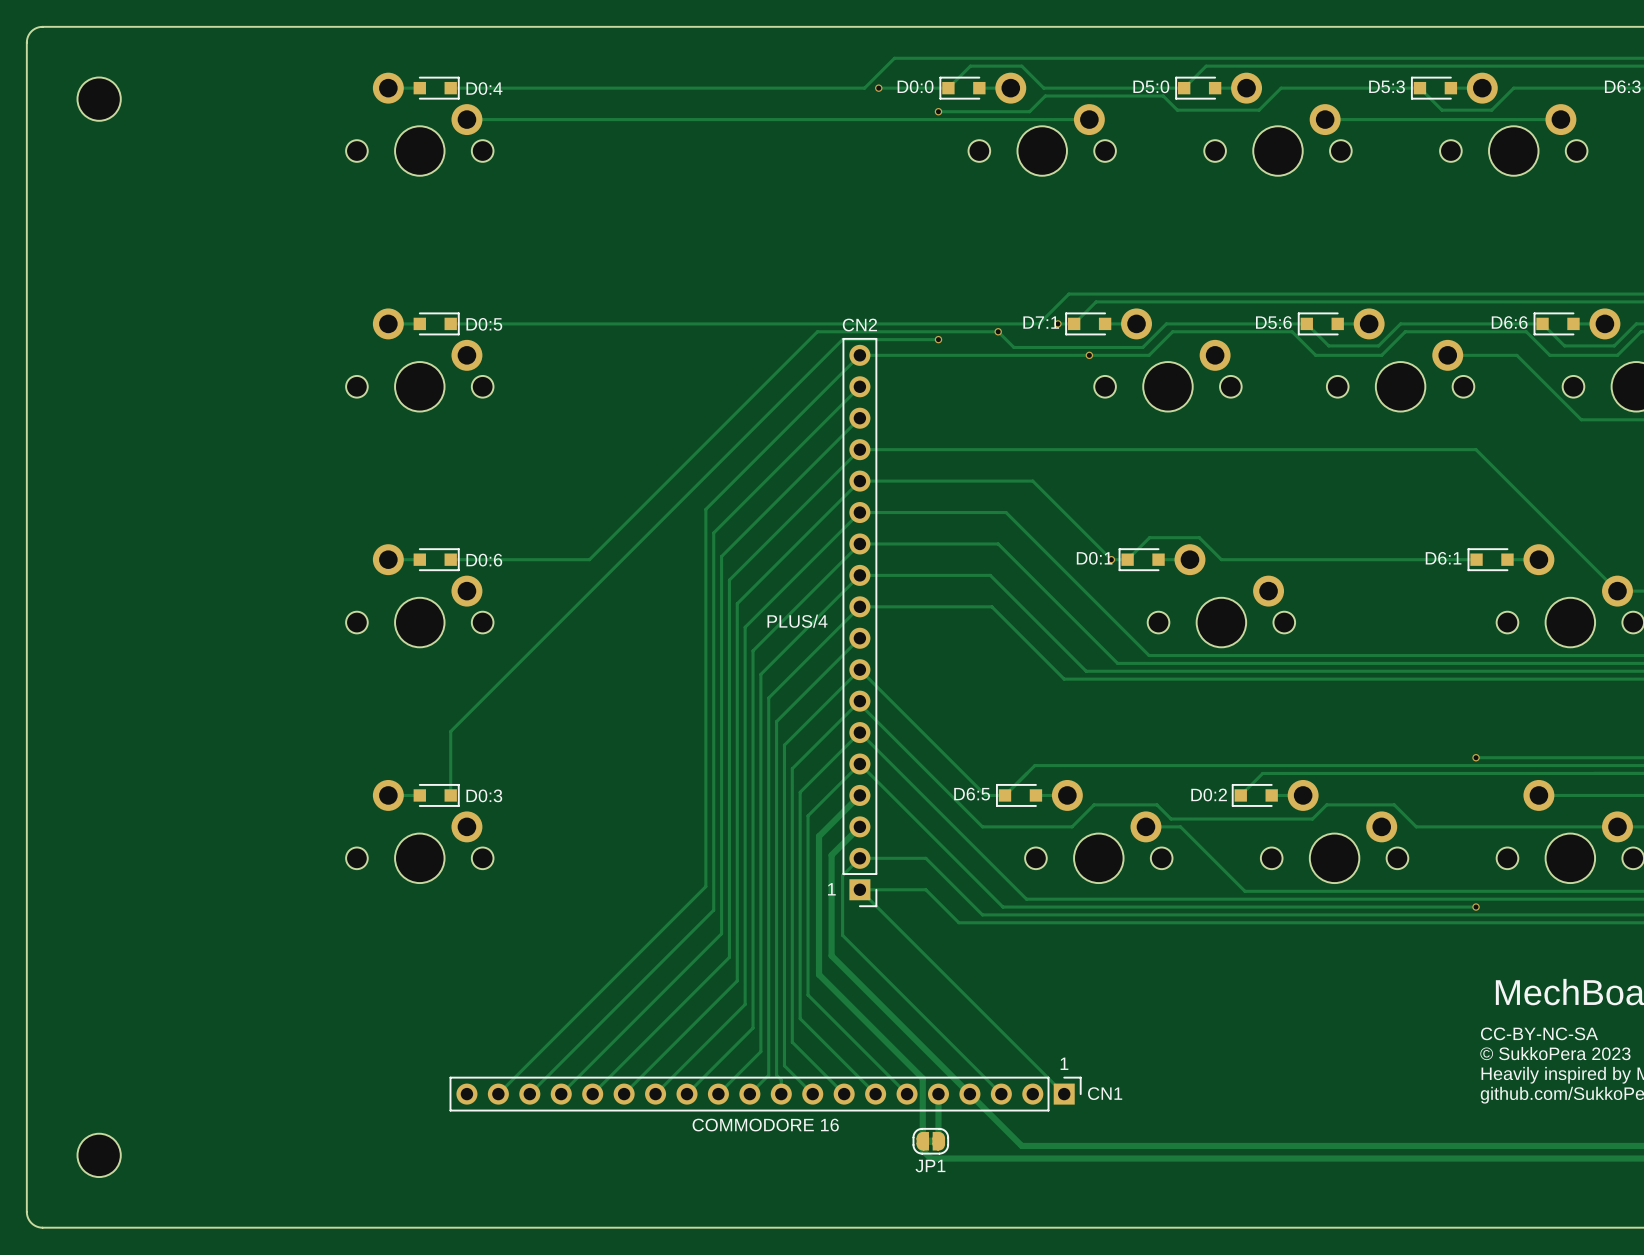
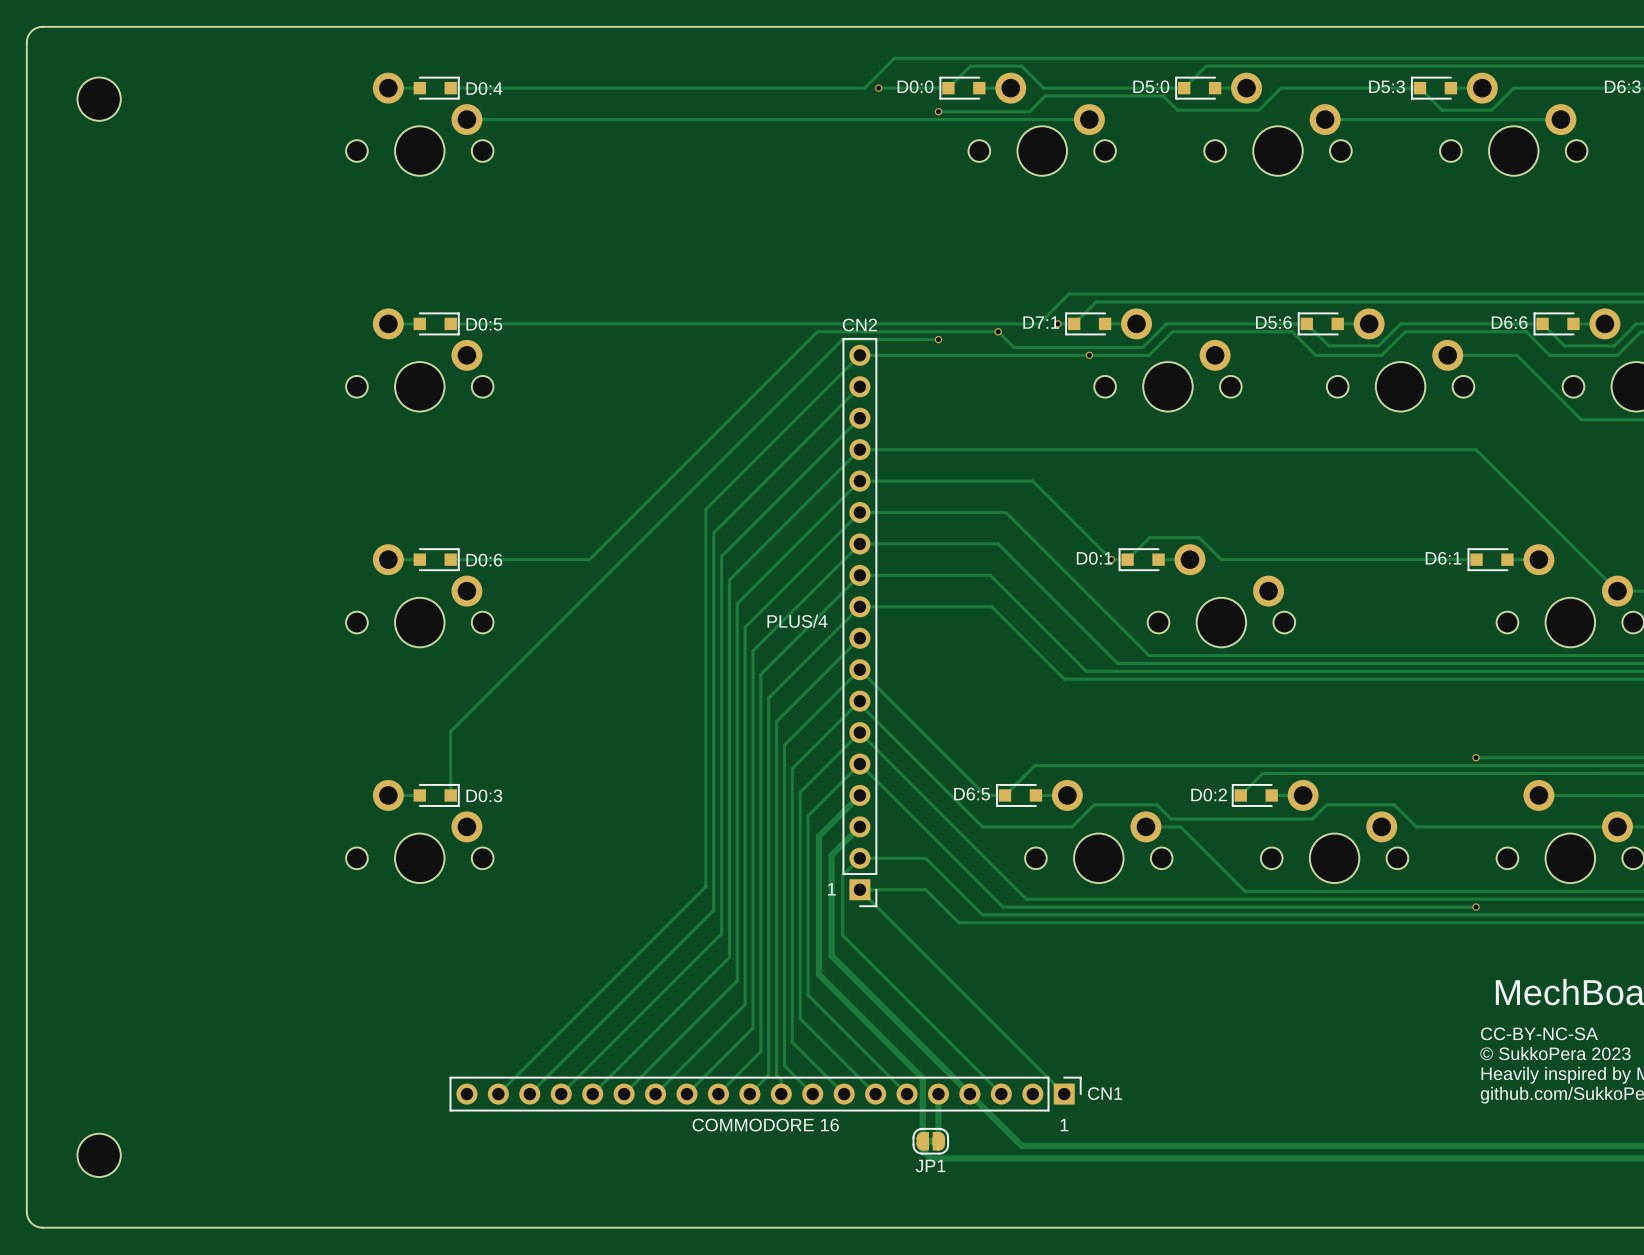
text position: 1 (1064, 1063) -> 1 (1064, 1125)

